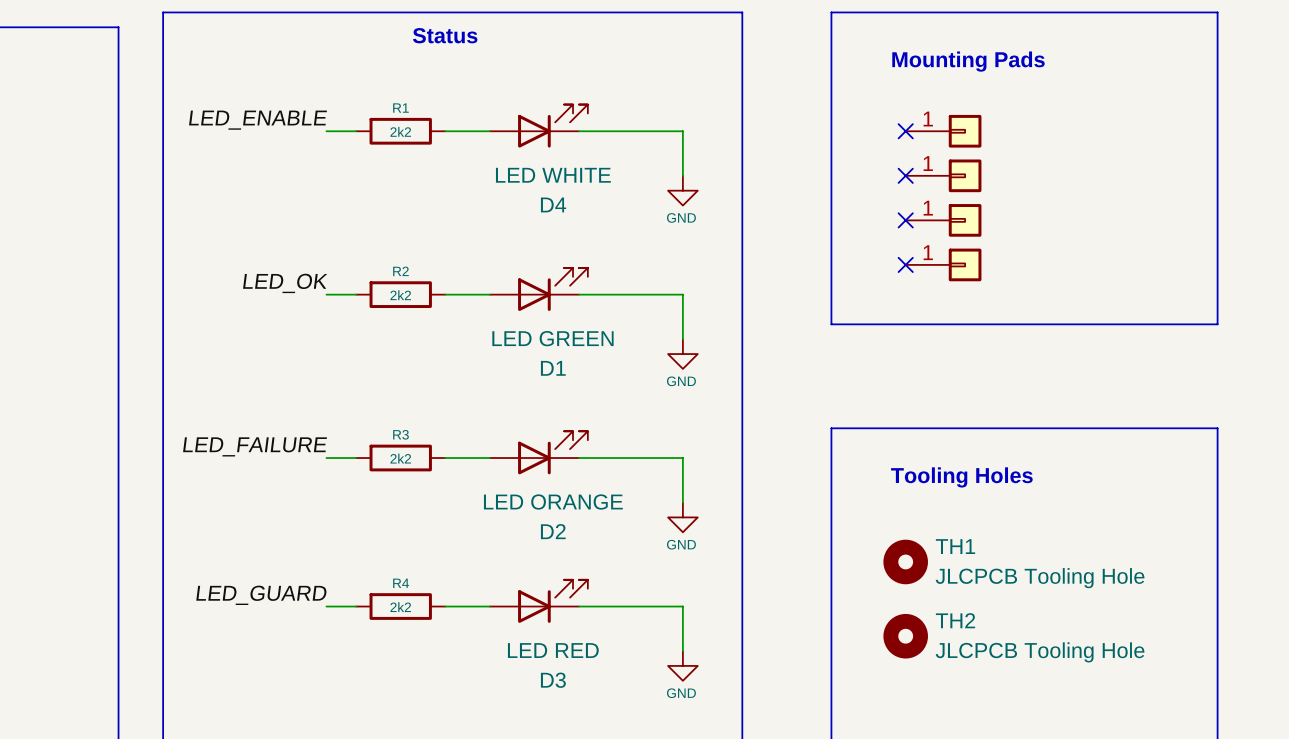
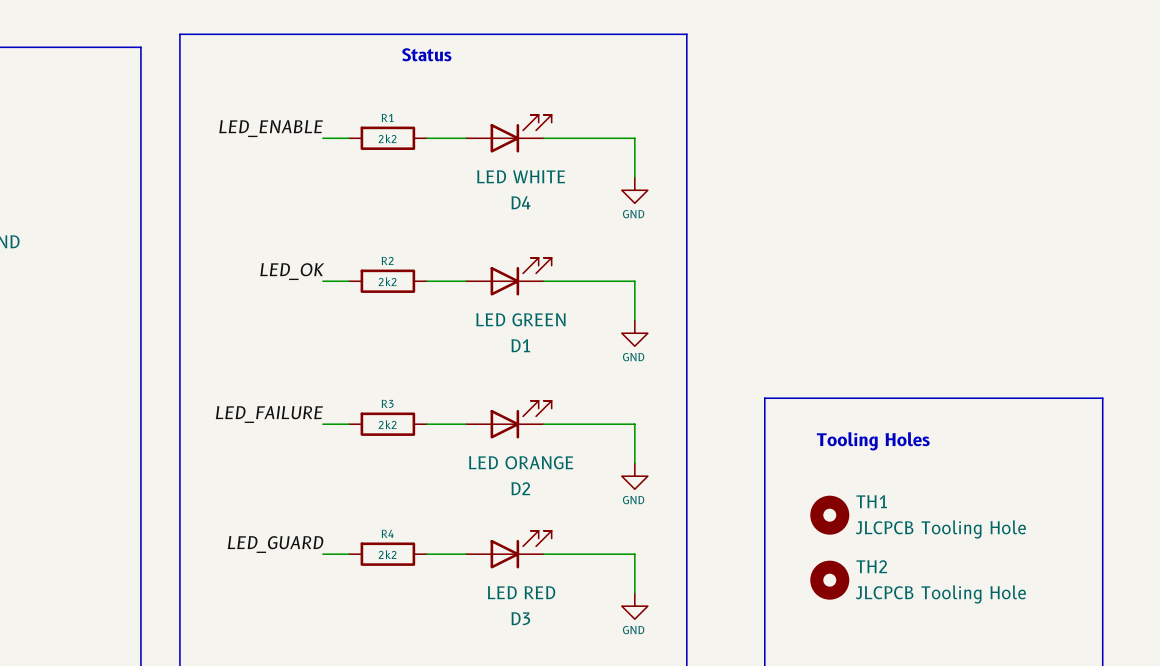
line: (831, 12) (1217, 12) (1217, 324) (831, 324) (831, 12) -> none
text: Mounting Pads (968, 61) -> none
no-connect mark: (905, 131) -> none
part: (943, 131) -> none
no-connect mark: (905, 175) -> none
part: (943, 175) -> none
no-connect mark: (905, 220) -> none
part: (943, 220) -> none
no-connect mark: (905, 264) -> none
part: (943, 264) -> none

